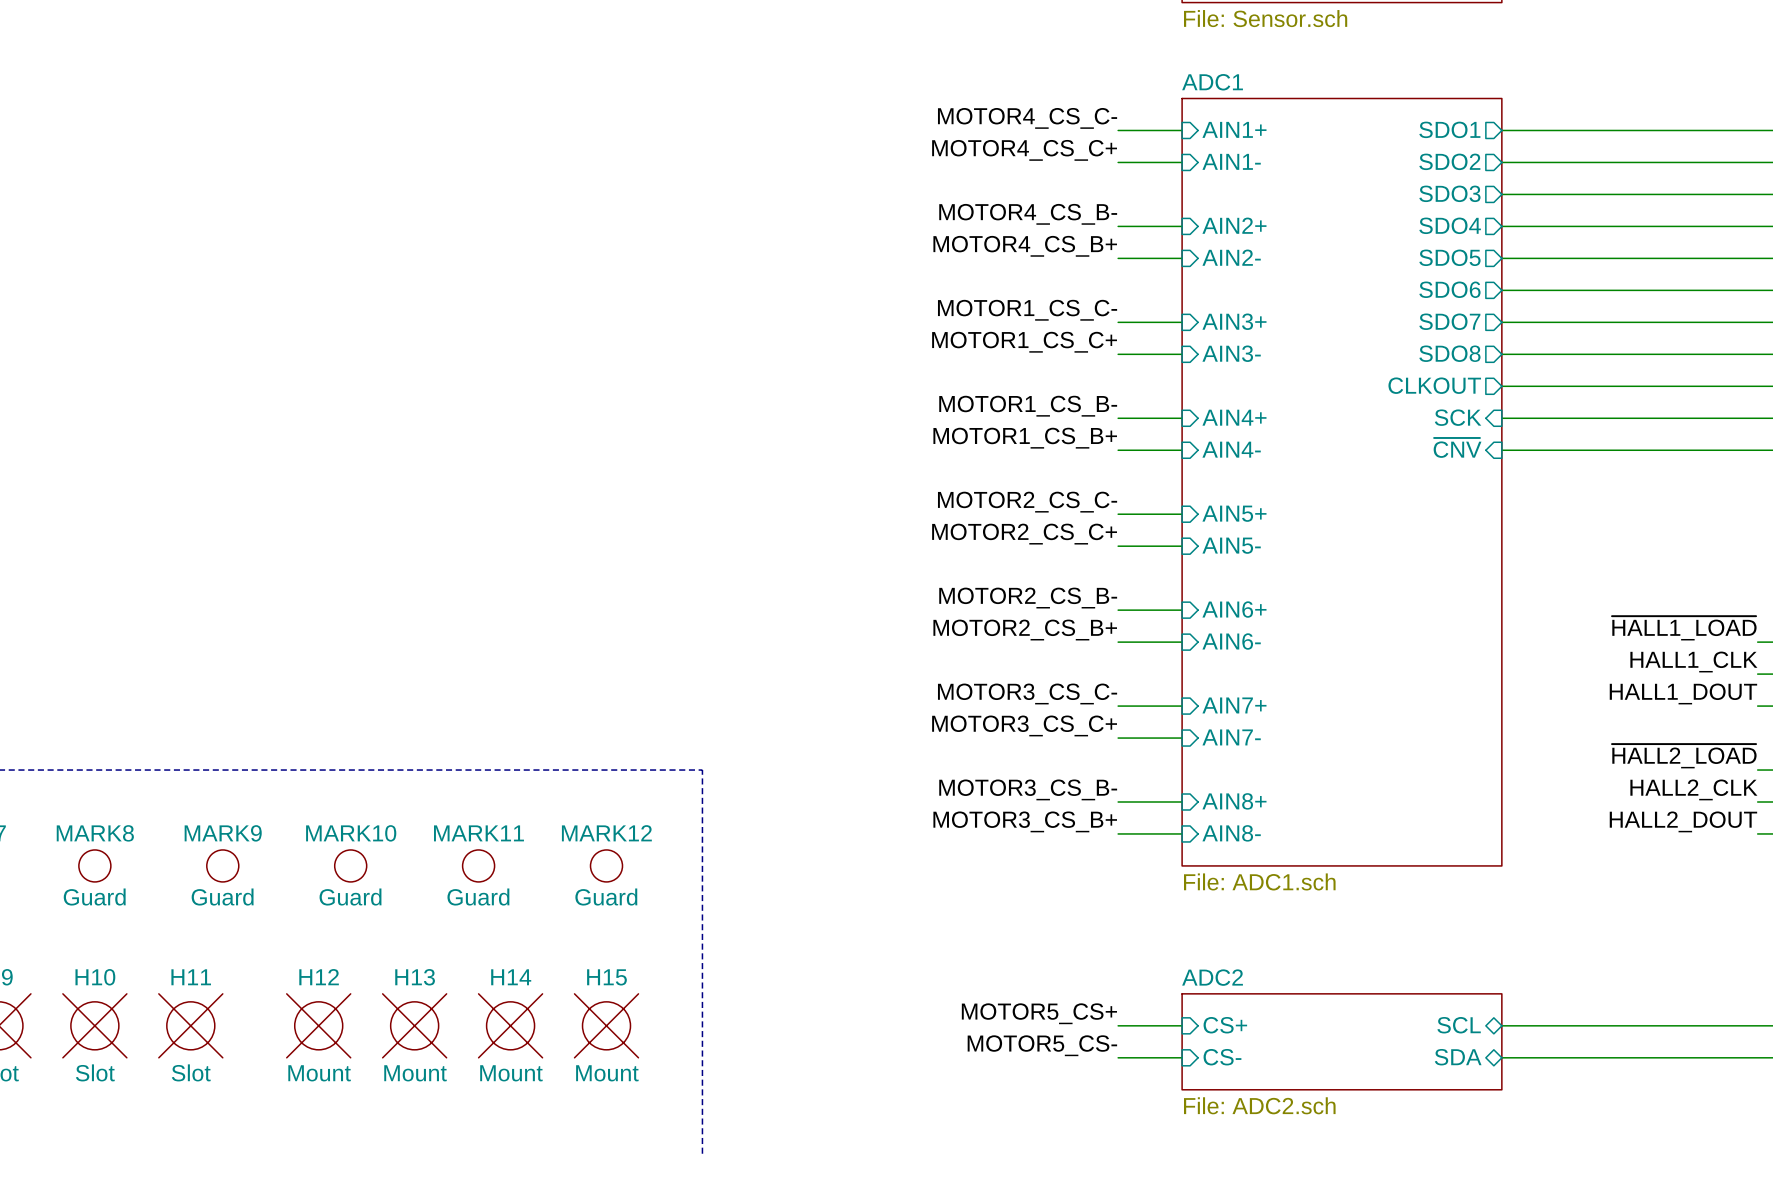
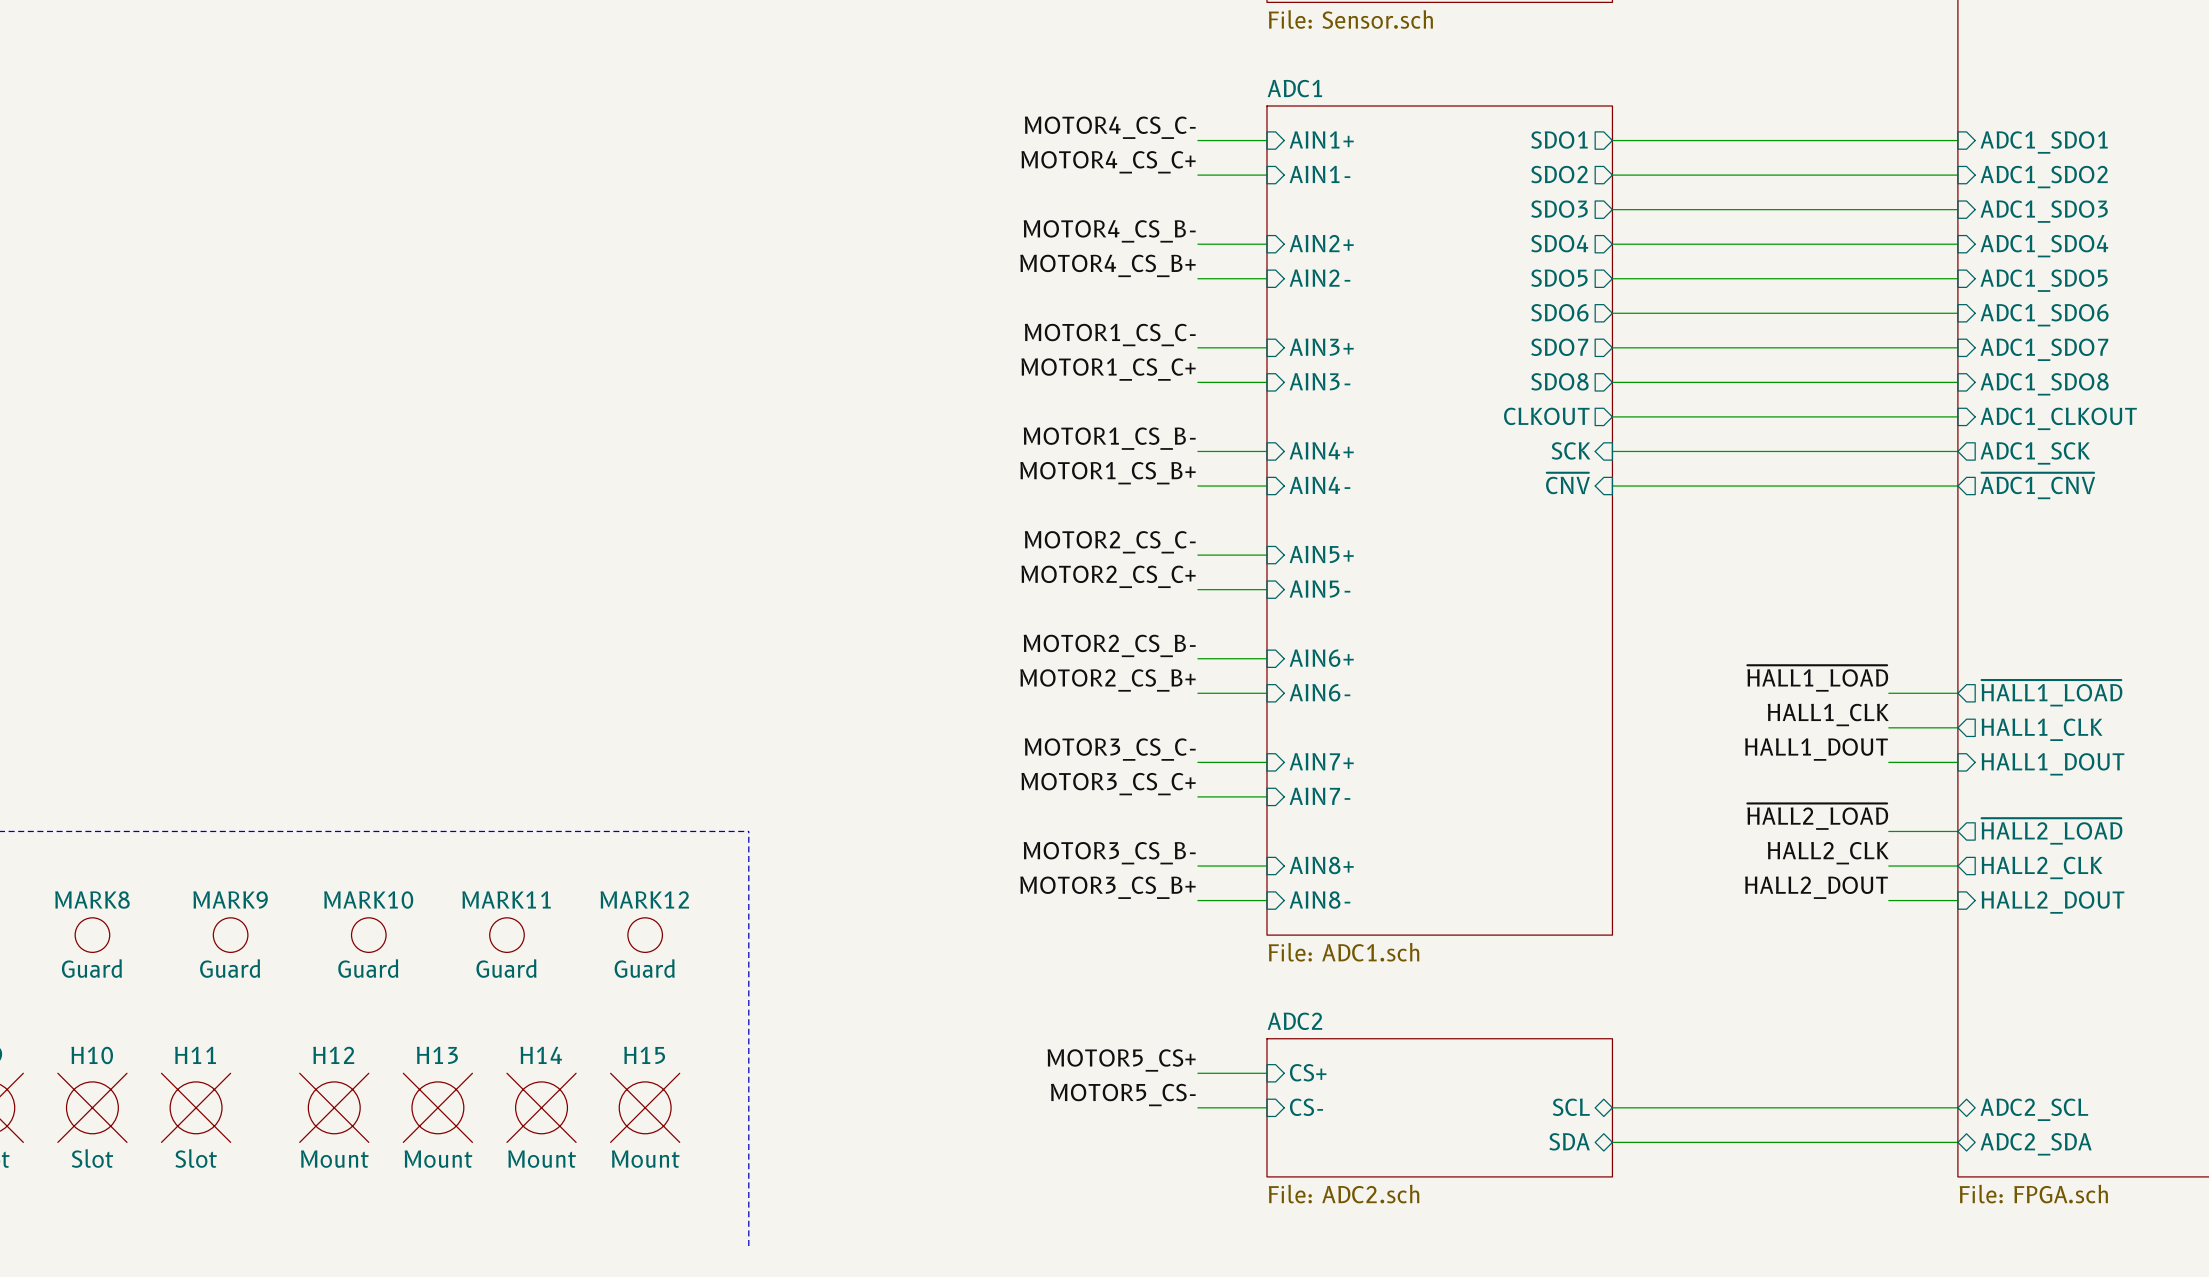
label: none -> MOTOR5_CS+ (1121, 1060)
sheet ADC2 shape: [1182, 993, 1502, 1090] -> [1266, 1038, 1613, 1177]
sheet pin: none -> CS+ (1308, 1072)
label: MOTOR5_CS+ (1039, 1013) -> MOTOR5_CS- (1123, 1095)
sheet pin: CS+ (1225, 1025) -> CS- (1306, 1107)
label: MOTOR5_CS- (1042, 1045) -> none
wire: (1118, 1057) (1182, 1057) -> (1197, 1073) (1266, 1073)
sheet pin: CS- (1222, 1057) -> none

